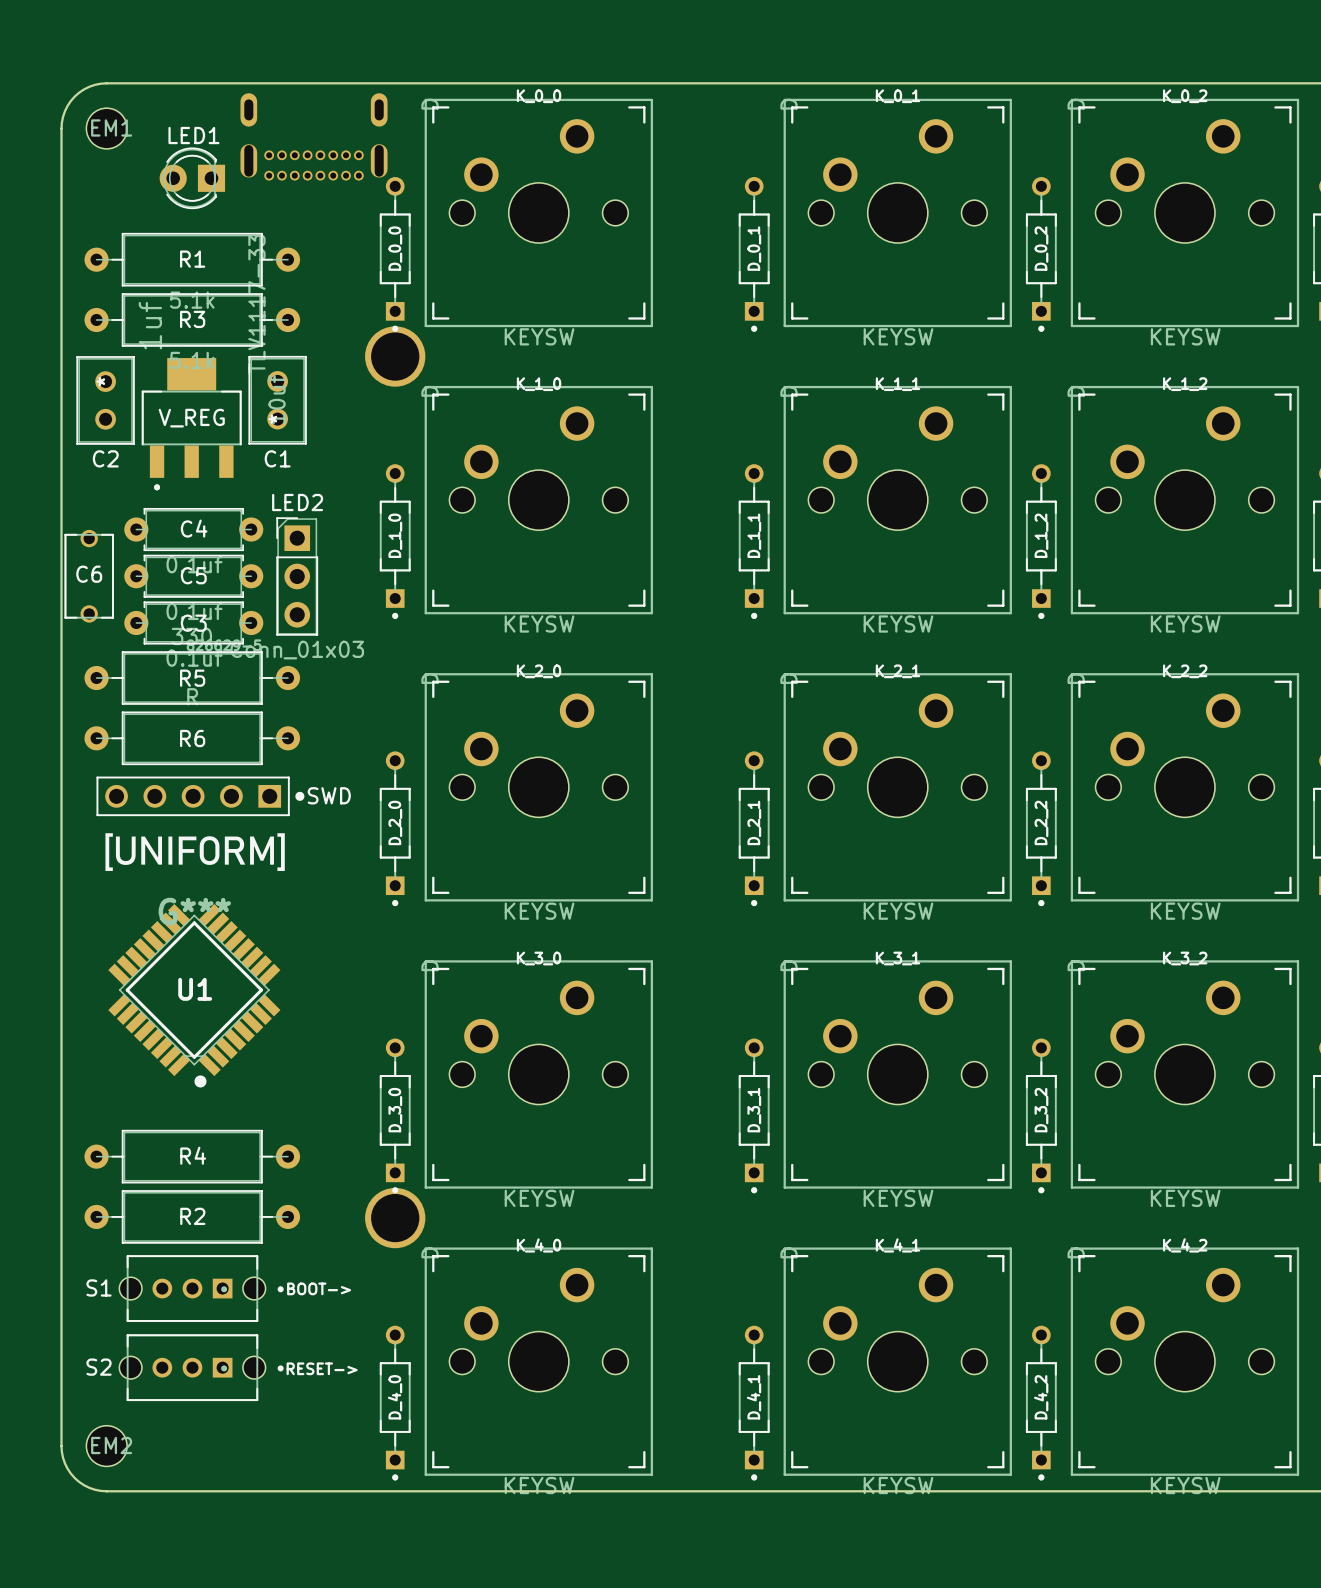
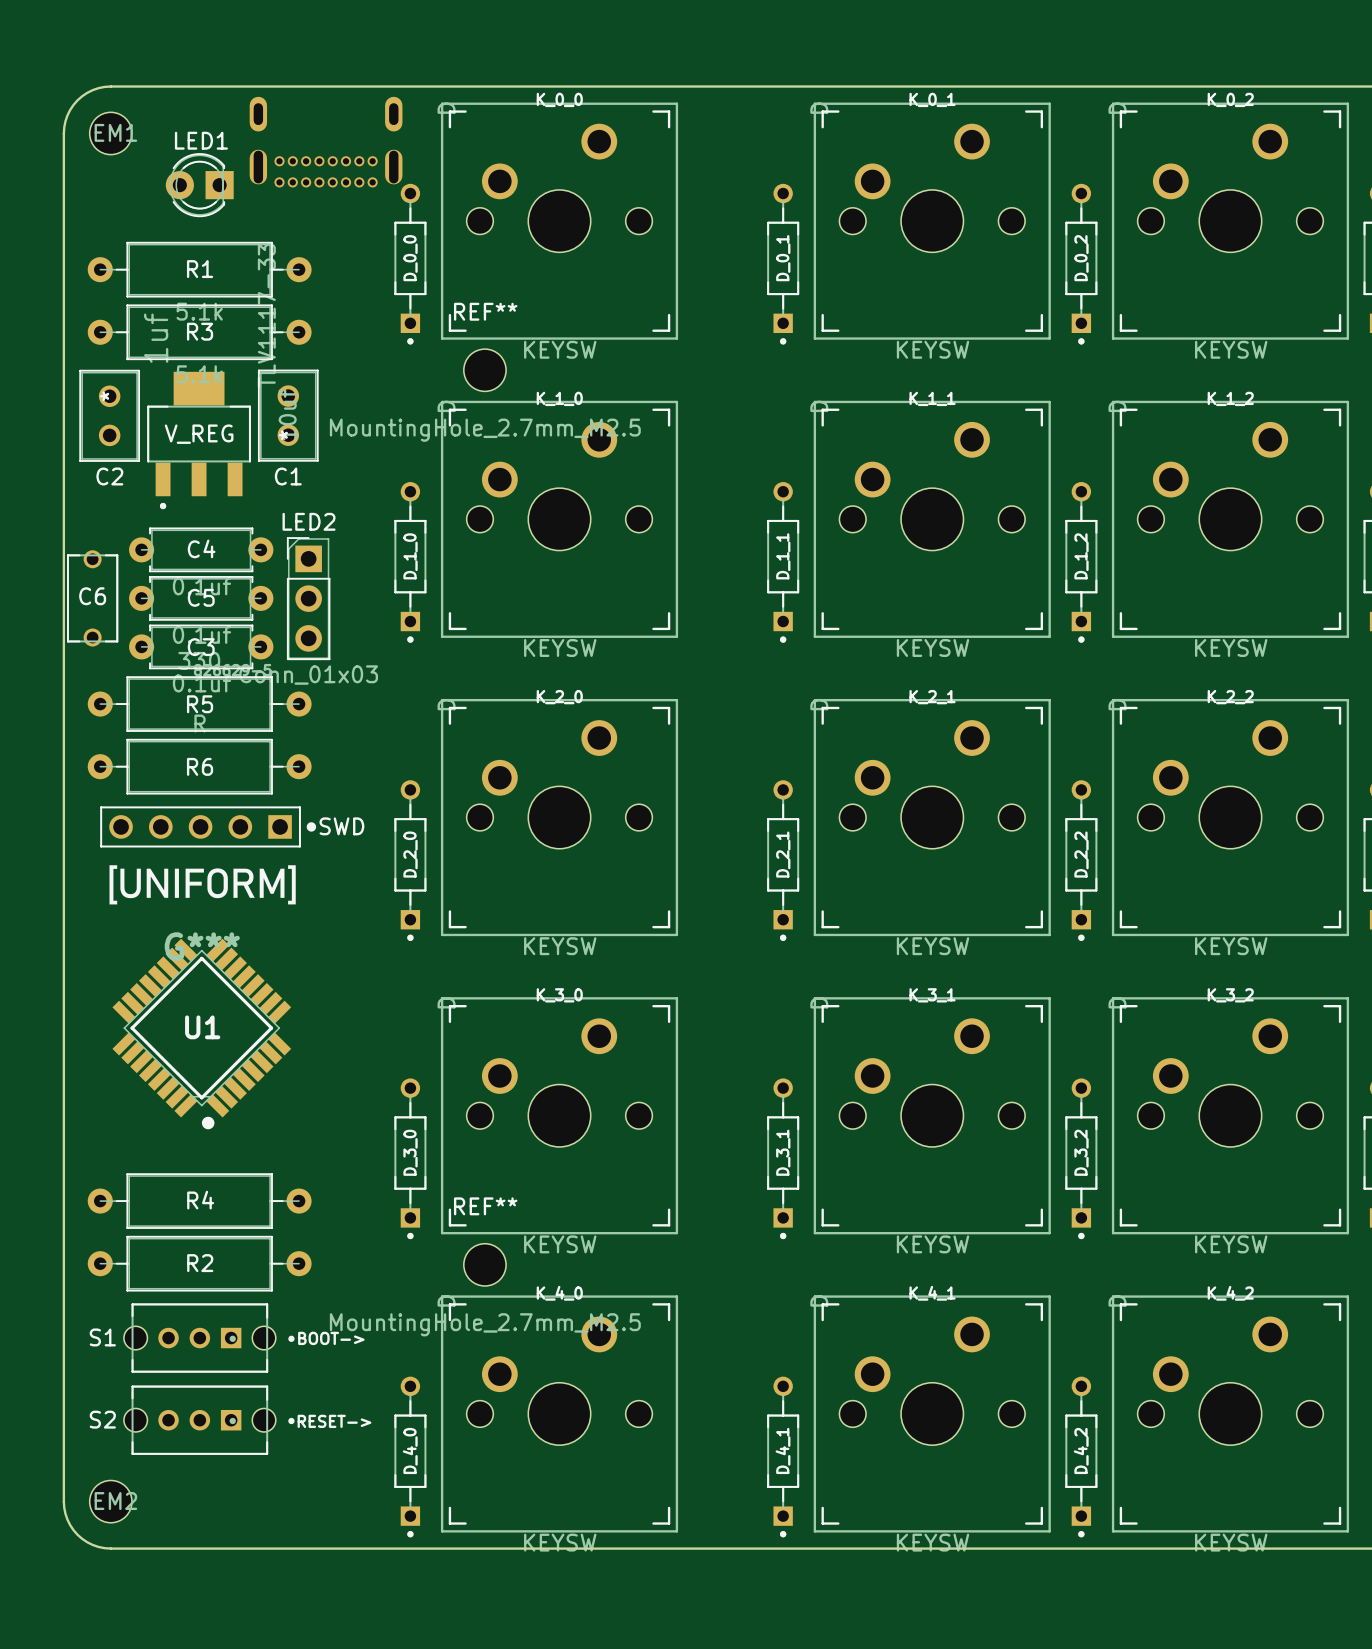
part: (395, 356) -> none
REF**: none -> MountingHole_2.7mm_M2.5 (484, 370)
part: (395, 1218) -> none
REF**: none -> MountingHole_2.7mm_M2.5 (484, 1264)

